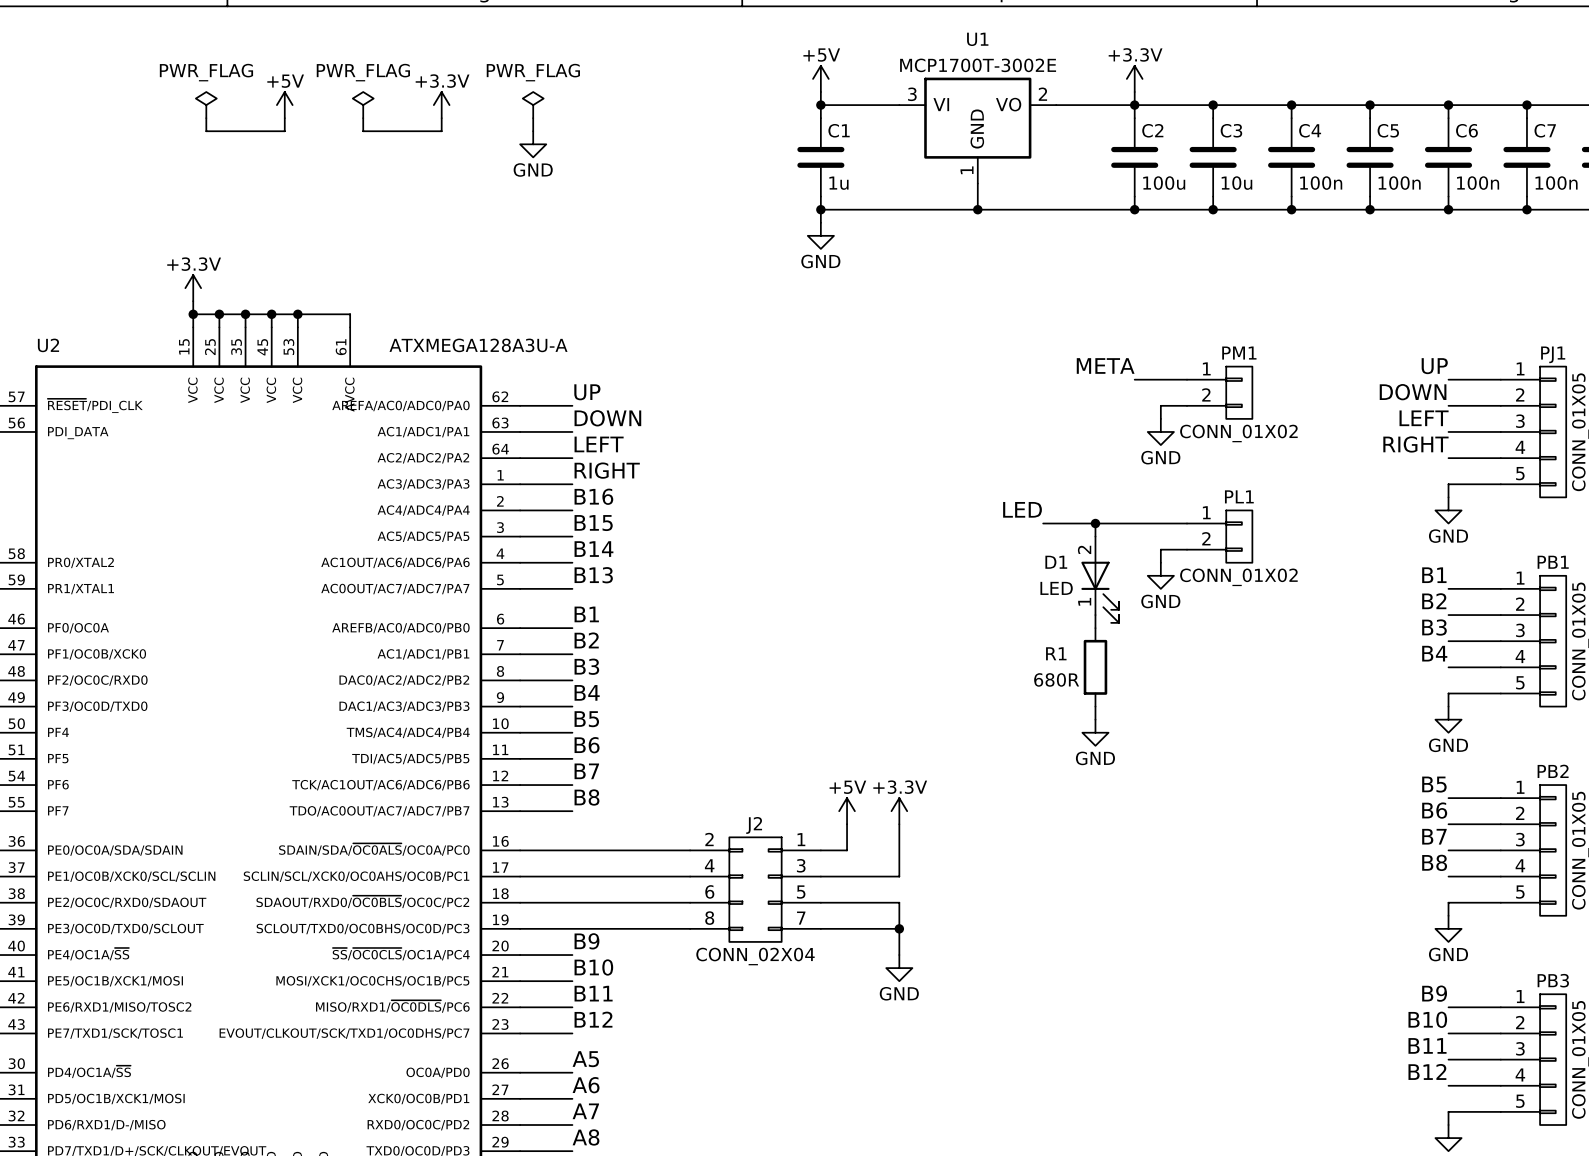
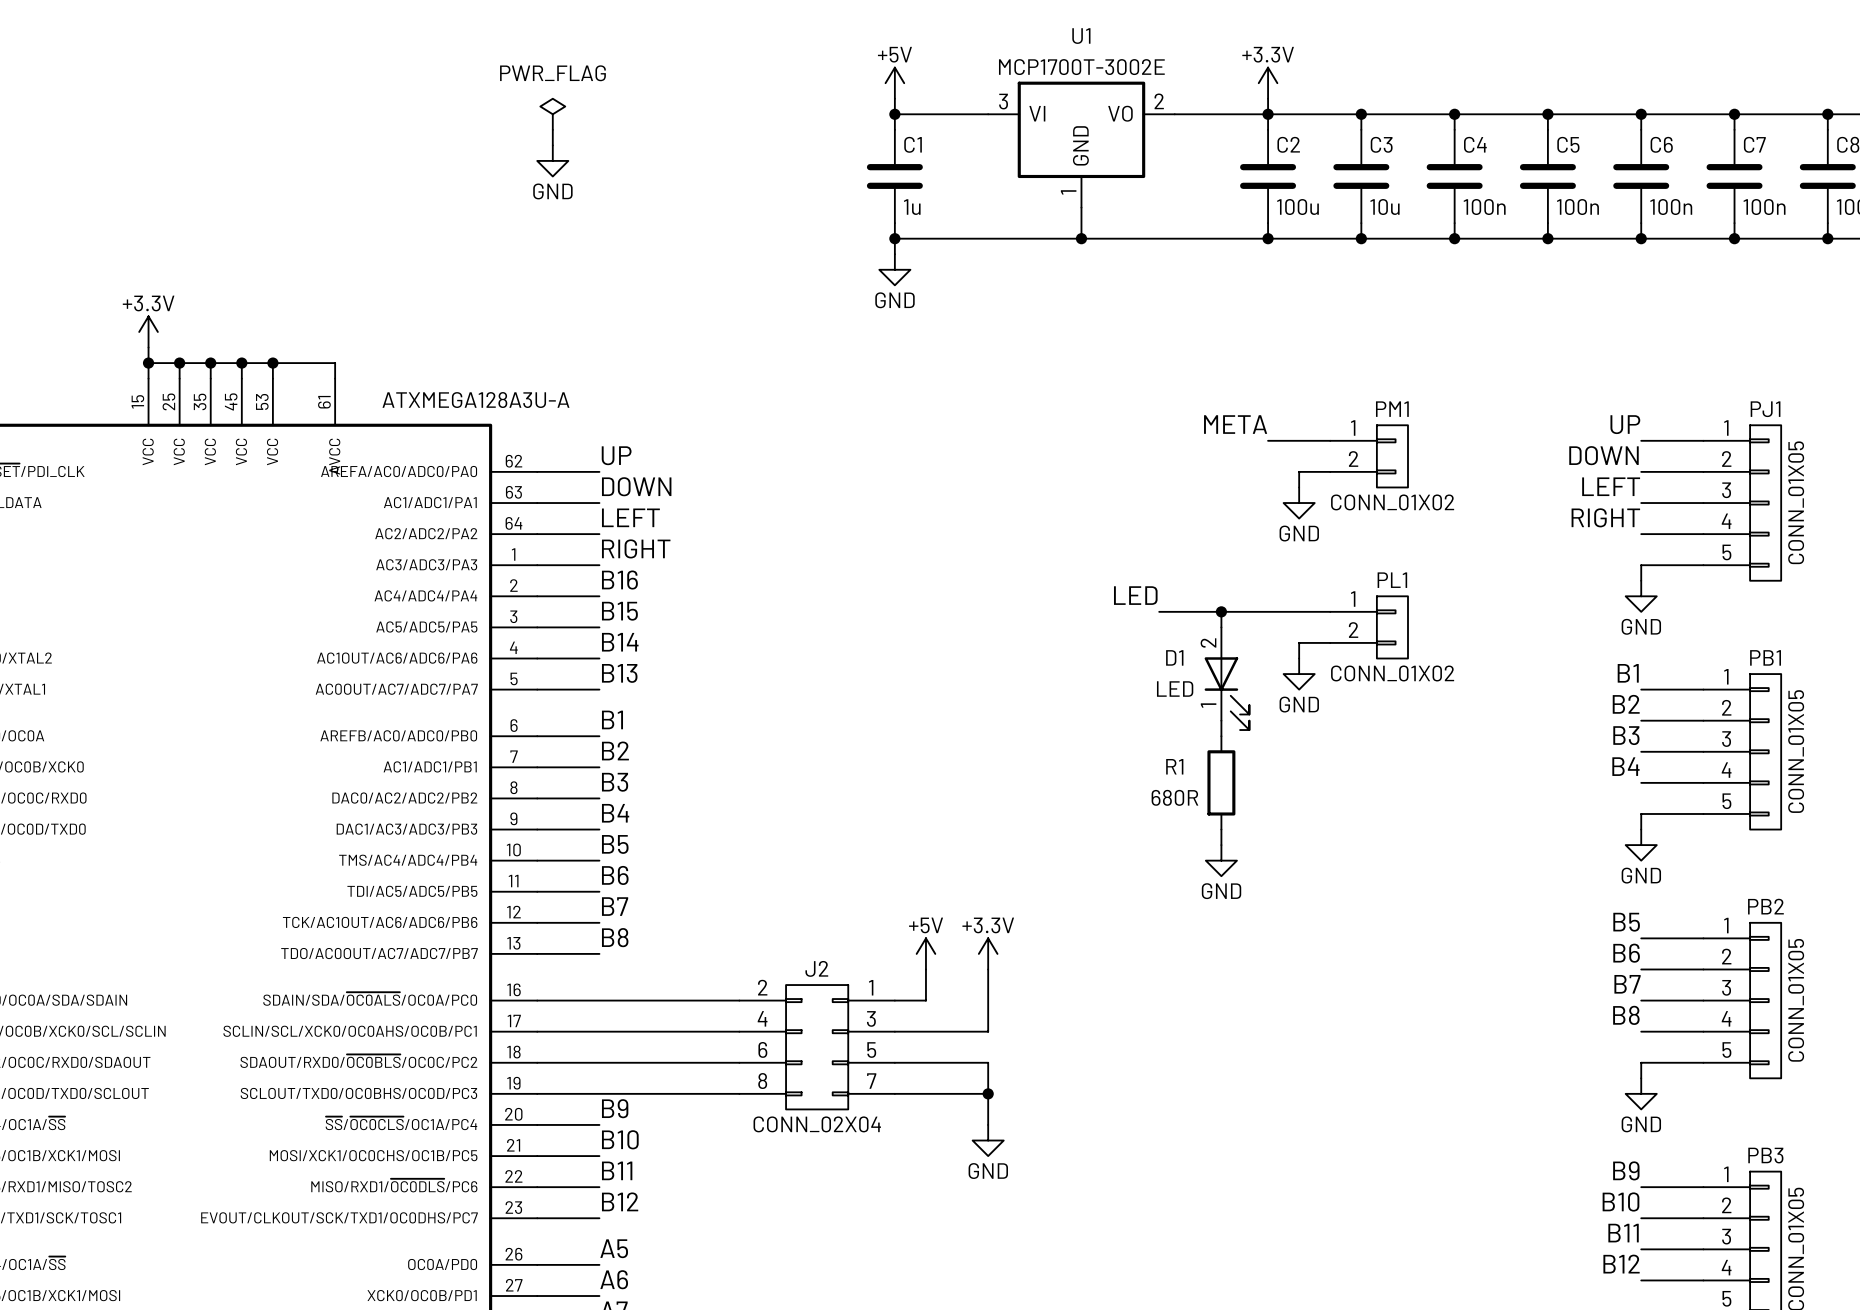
power symbol: PWR_FLAG (206, 105) -> none
power symbol: +5V (284, 105) -> none
power symbol: PWR_FLAG (363, 105) -> none
power symbol: +3.3V (441, 105) -> none
wire: (206, 118) (206, 131) (284, 131) (284, 118) -> none
wire: (363, 118) (363, 131) (441, 131) (441, 118) -> none

